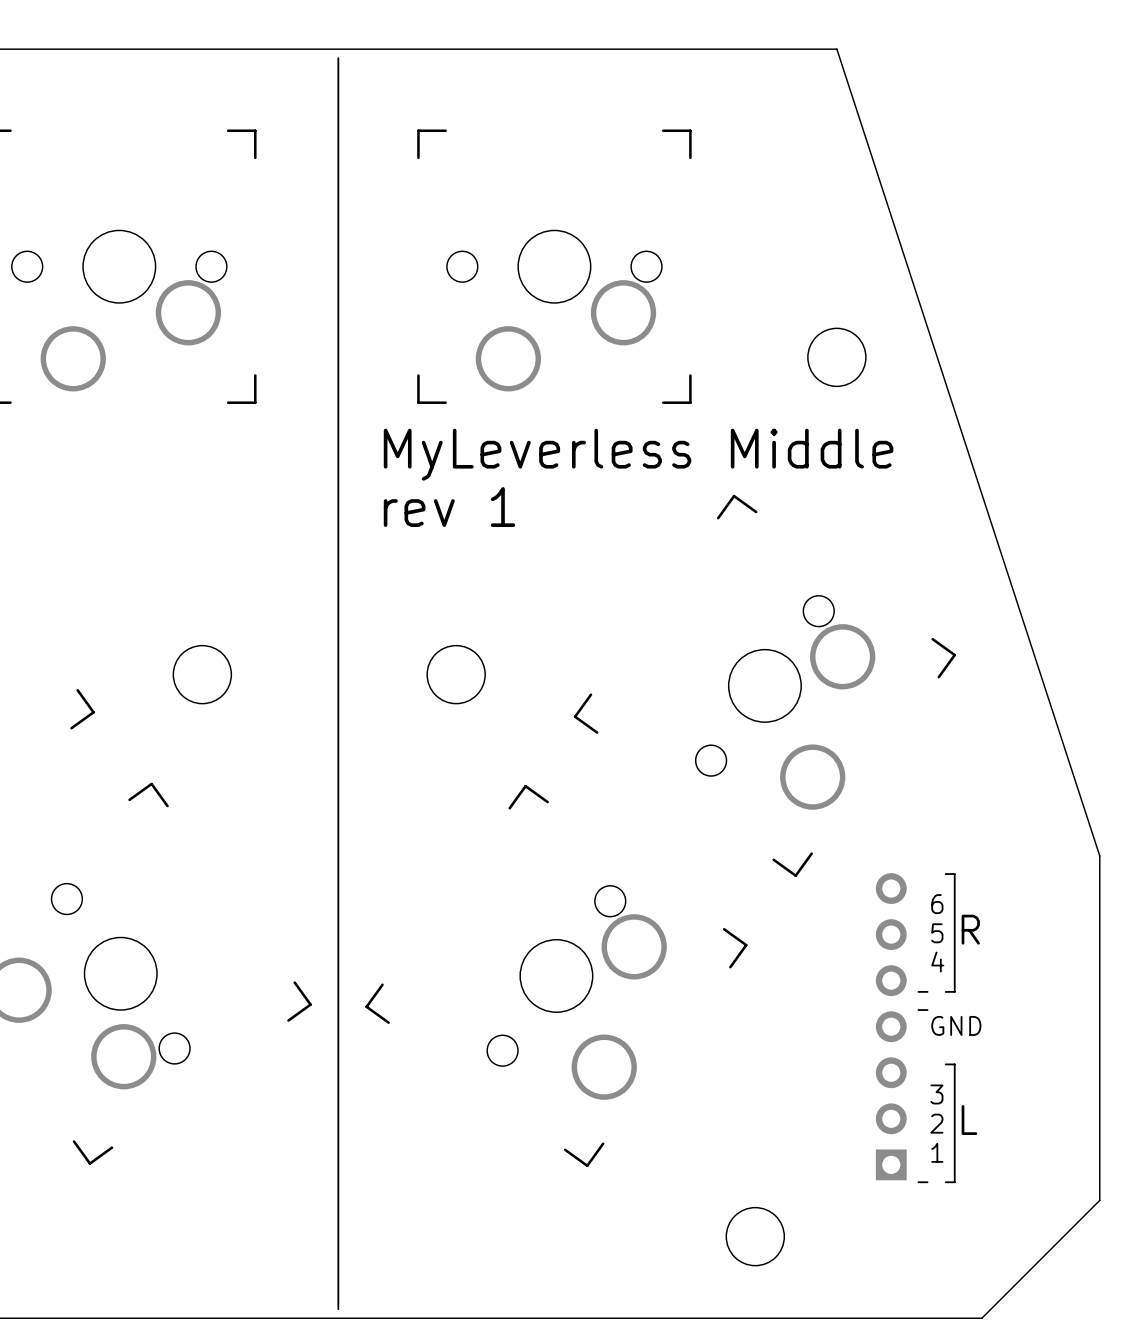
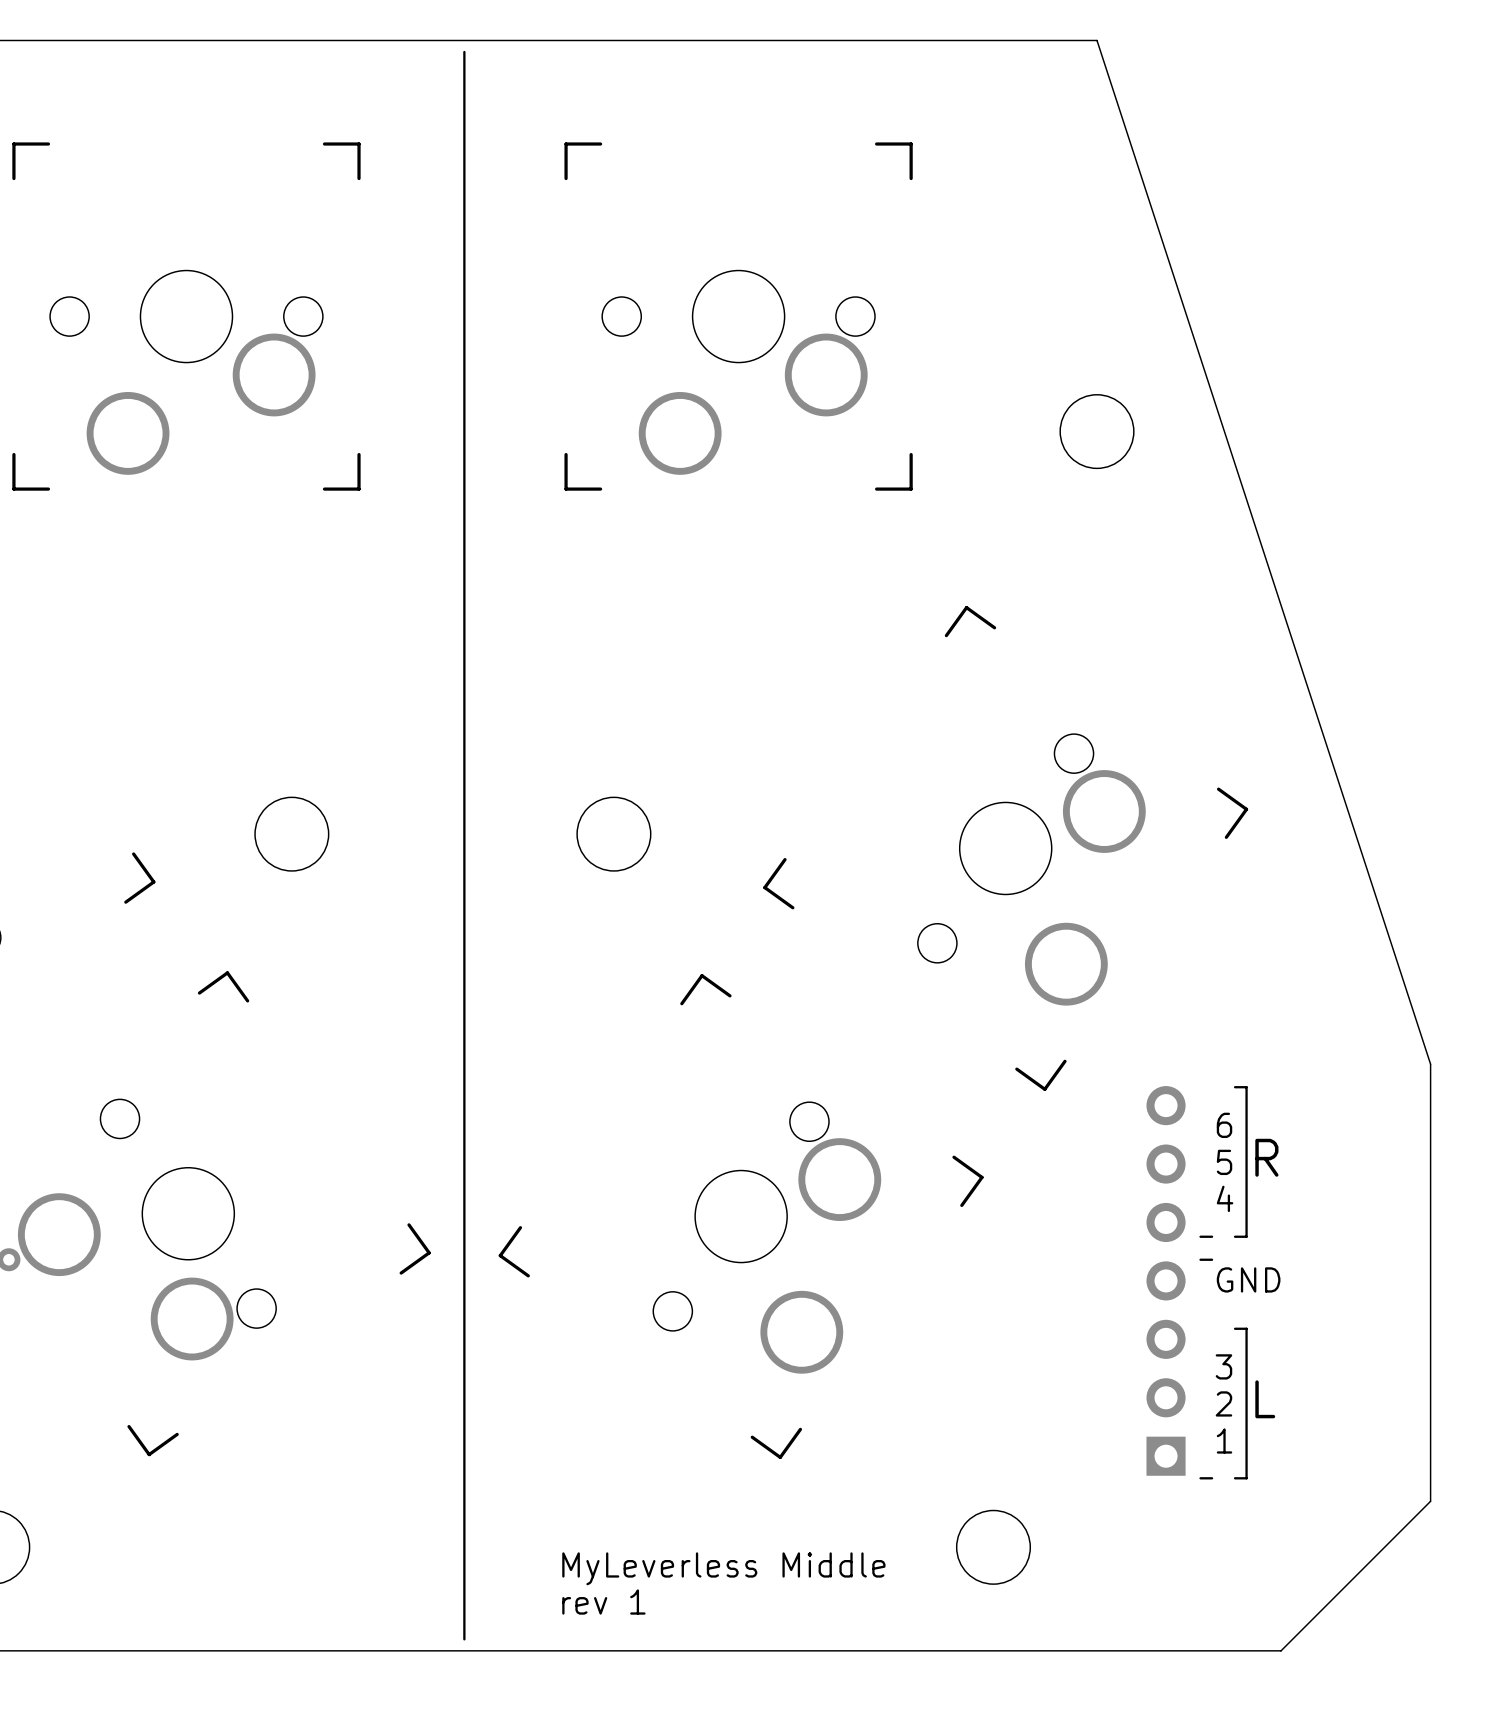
text: MyLeverless Middle (638, 454) -> none
text: rev 1 (449, 507) -> none
text: none -> MyLeverless Middle (723, 1568)
text: none -> rev 1 (603, 1602)

